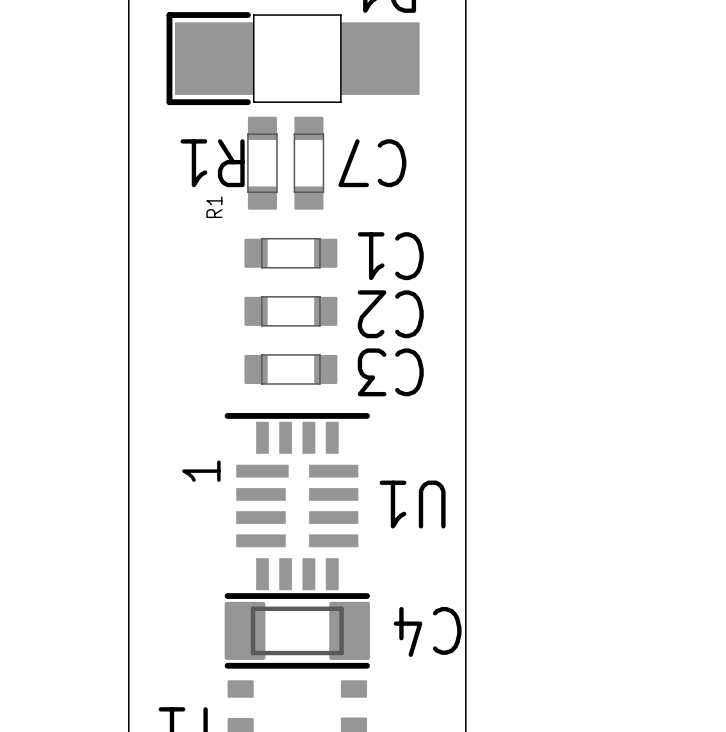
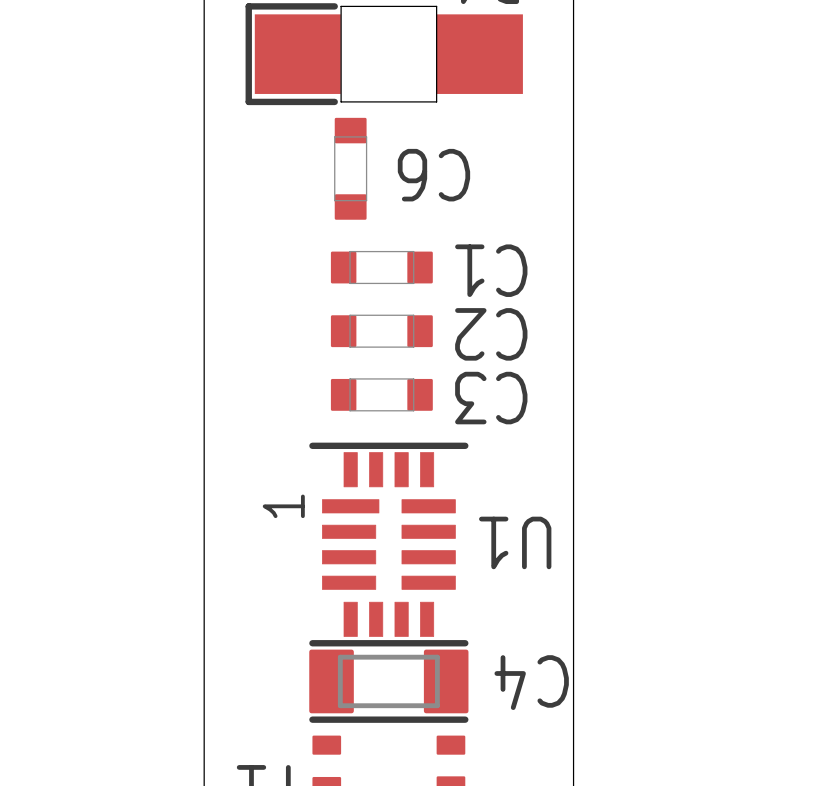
text: R1 (212, 163) -> none
part: (308, 163) -> none
text: C7 (372, 163) -> C6 (433, 175)
R1 name: R1 (214, 207) -> none

